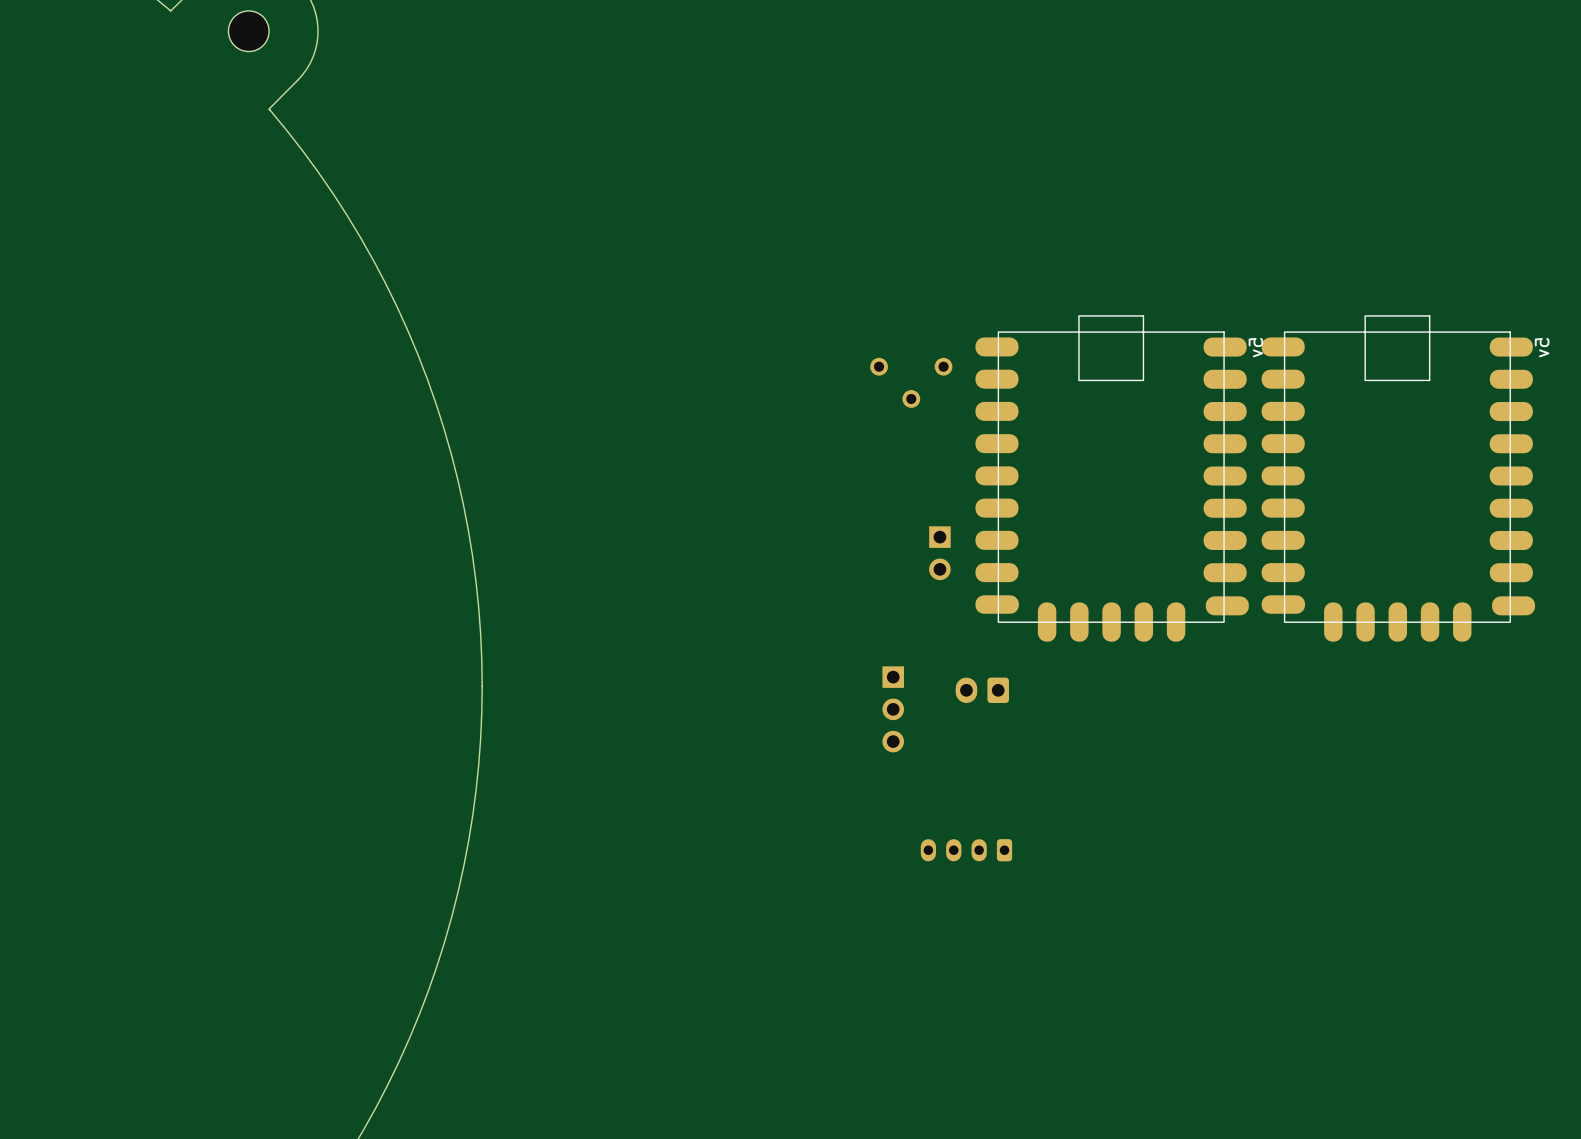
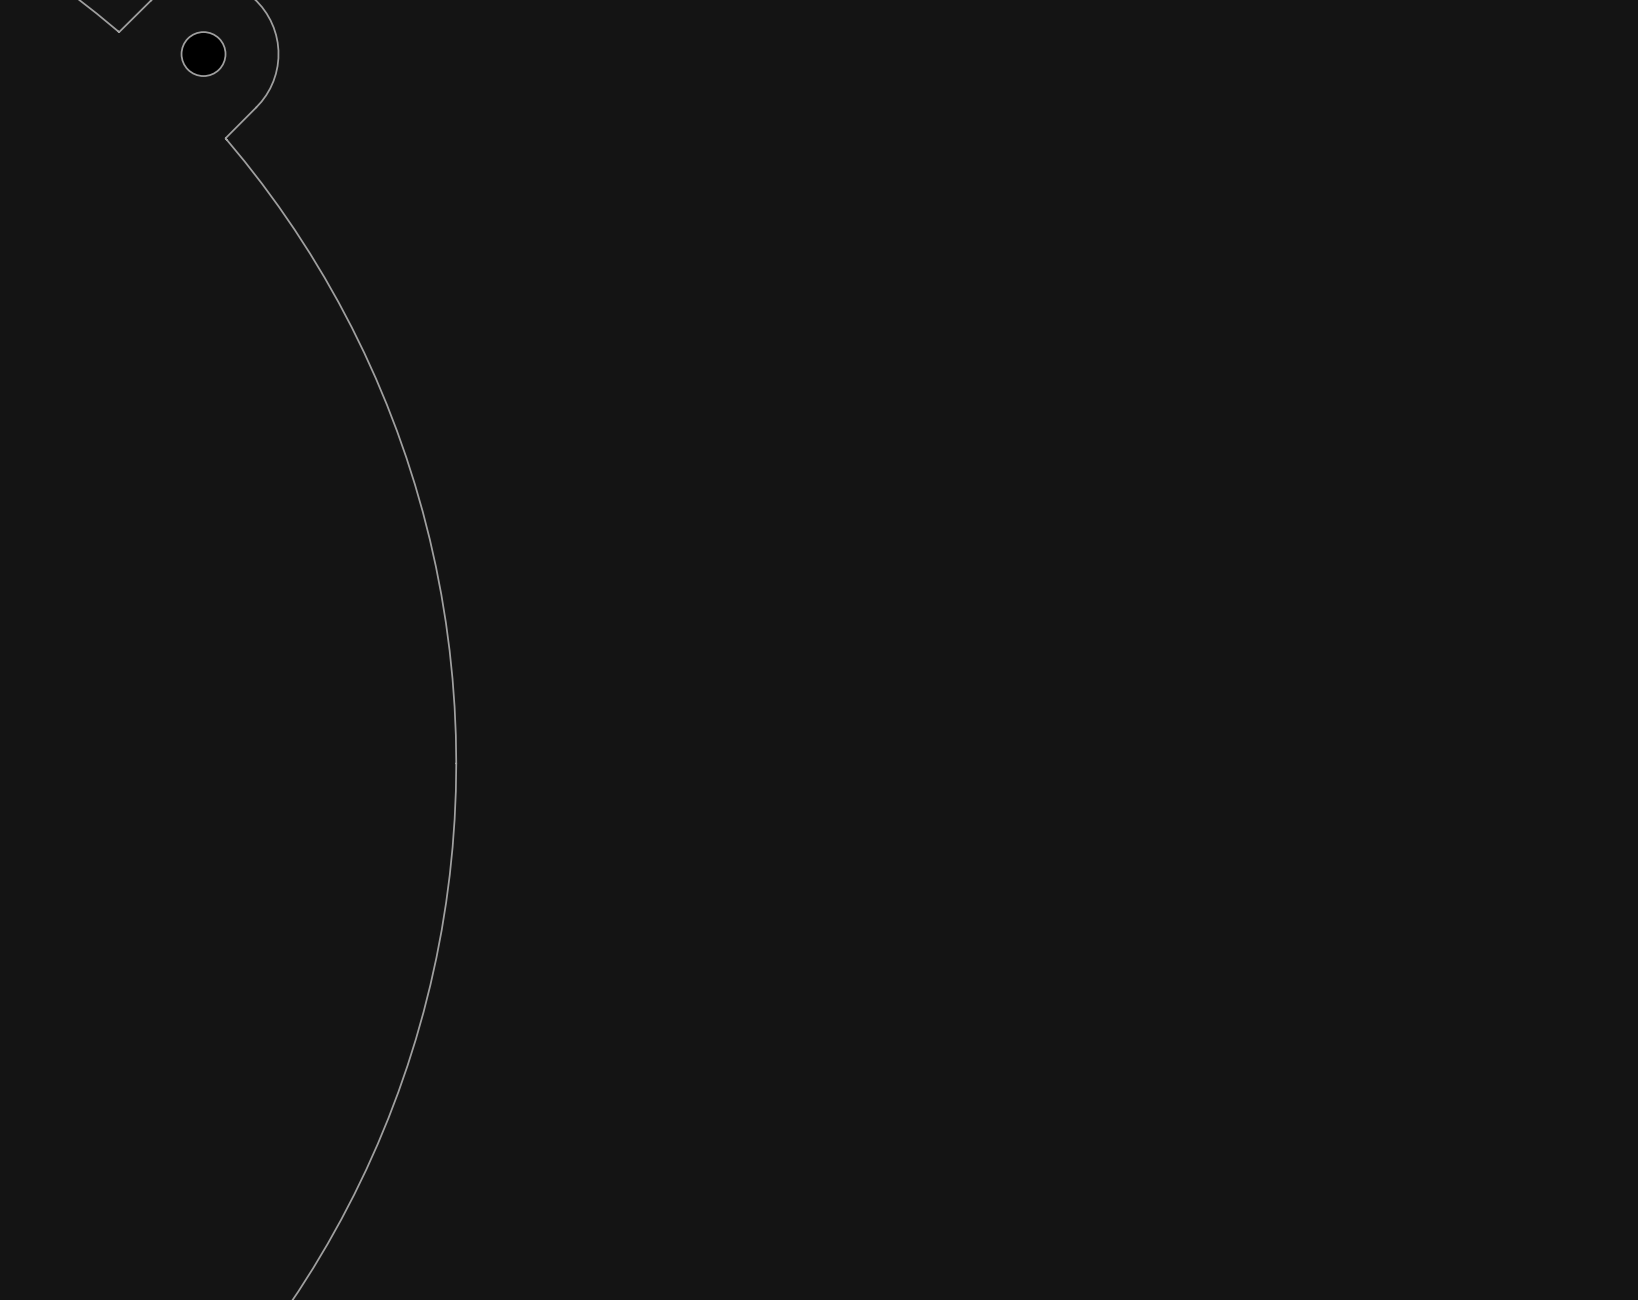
part: (911, 382) -> none
part: (1112, 478) -> none
part: (1398, 478) -> none
part: (939, 553) -> none
part: (982, 690) -> none
part: (893, 709) -> none
part: (966, 850) -> none

